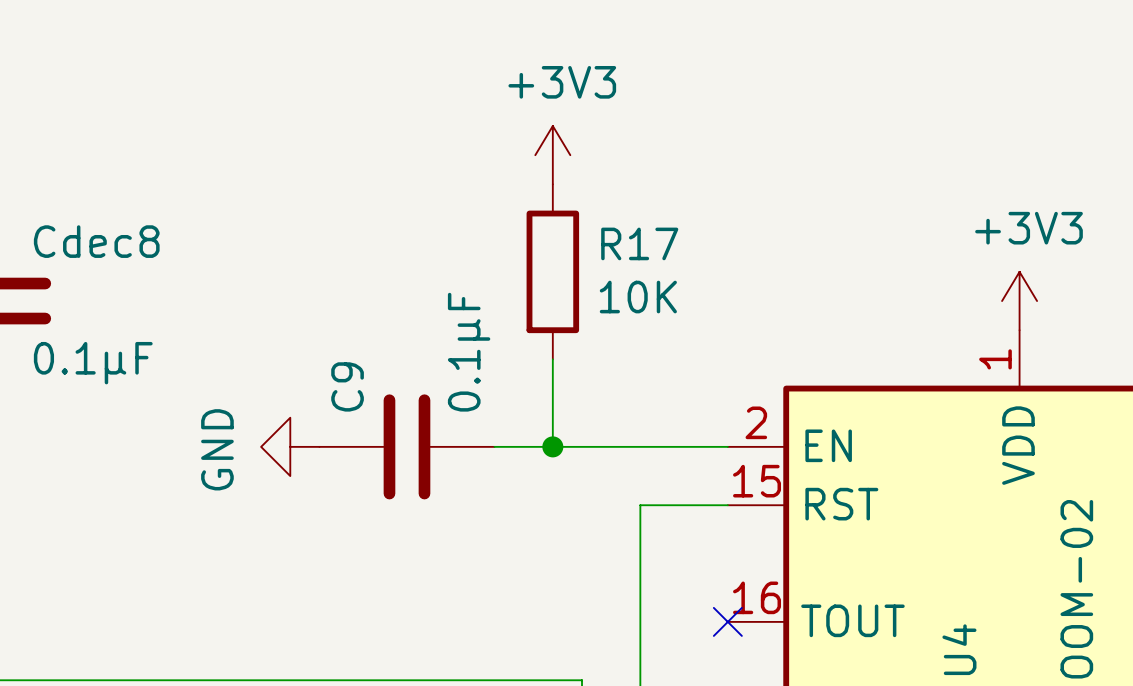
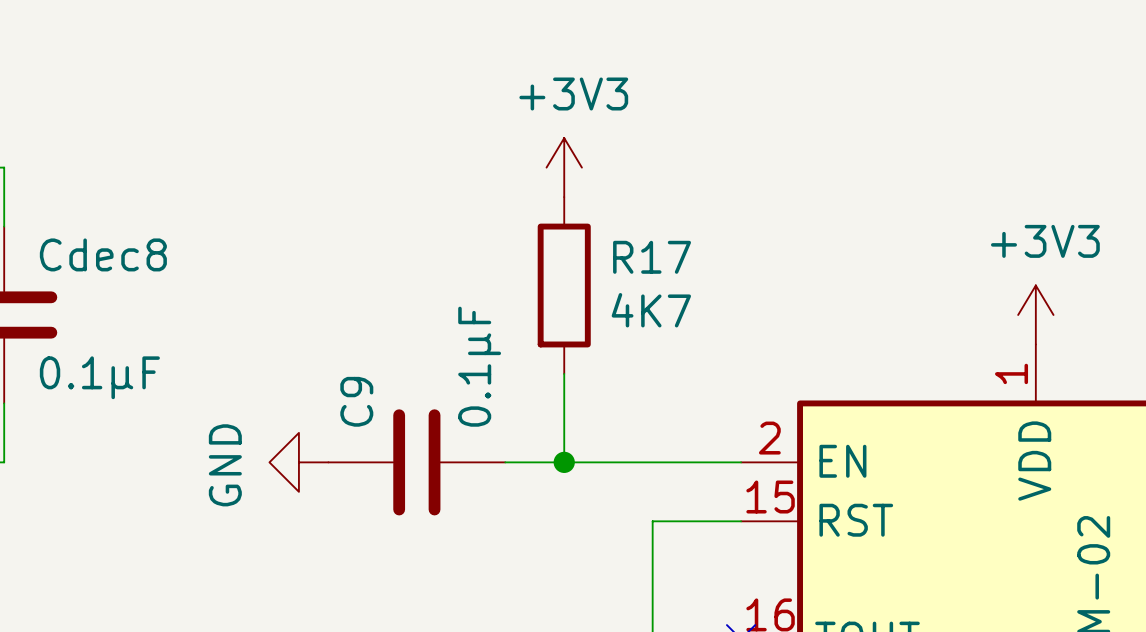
R17 value: 10K (638, 297) -> 4K7 (651, 310)

